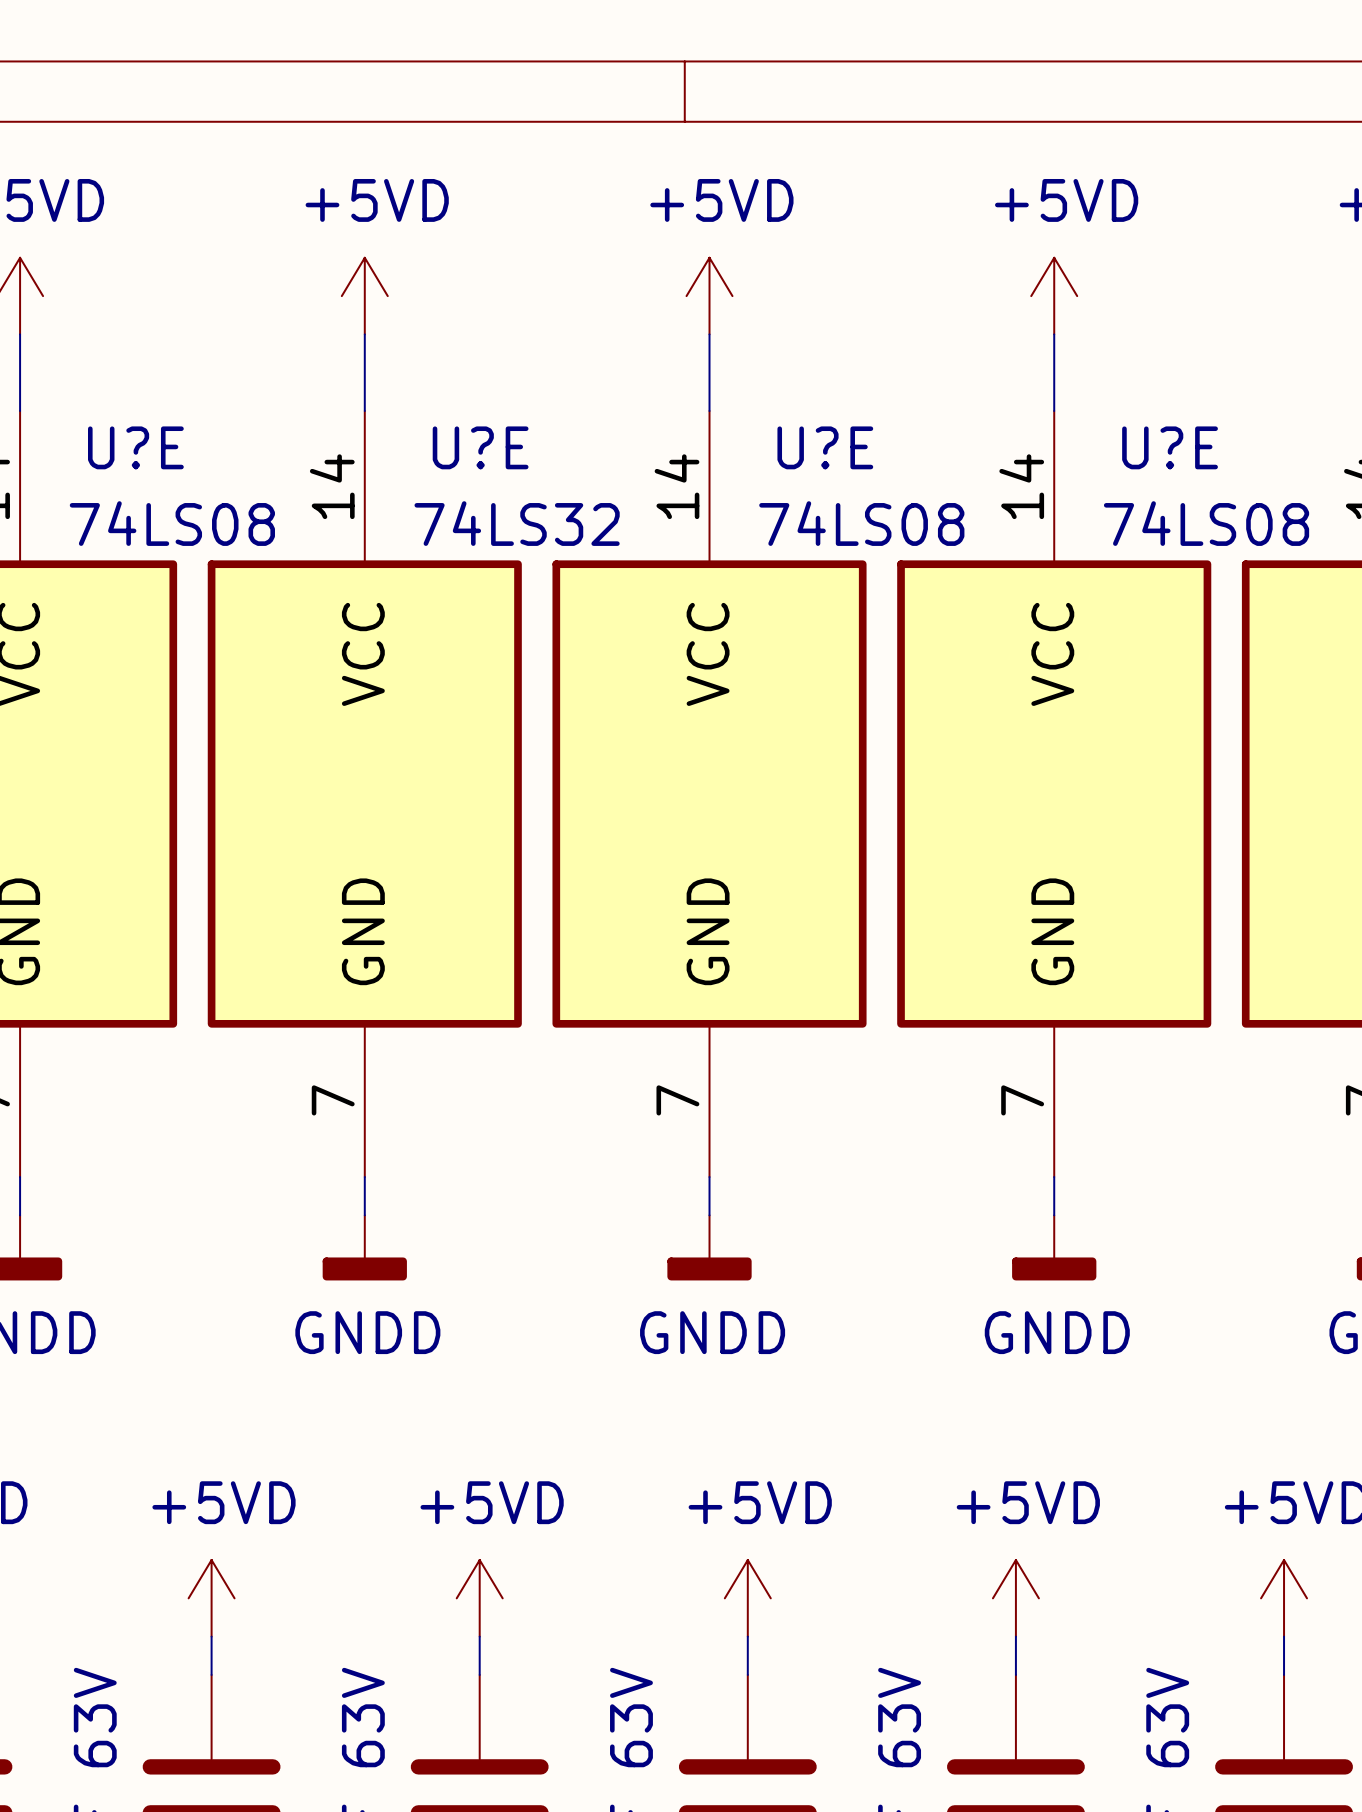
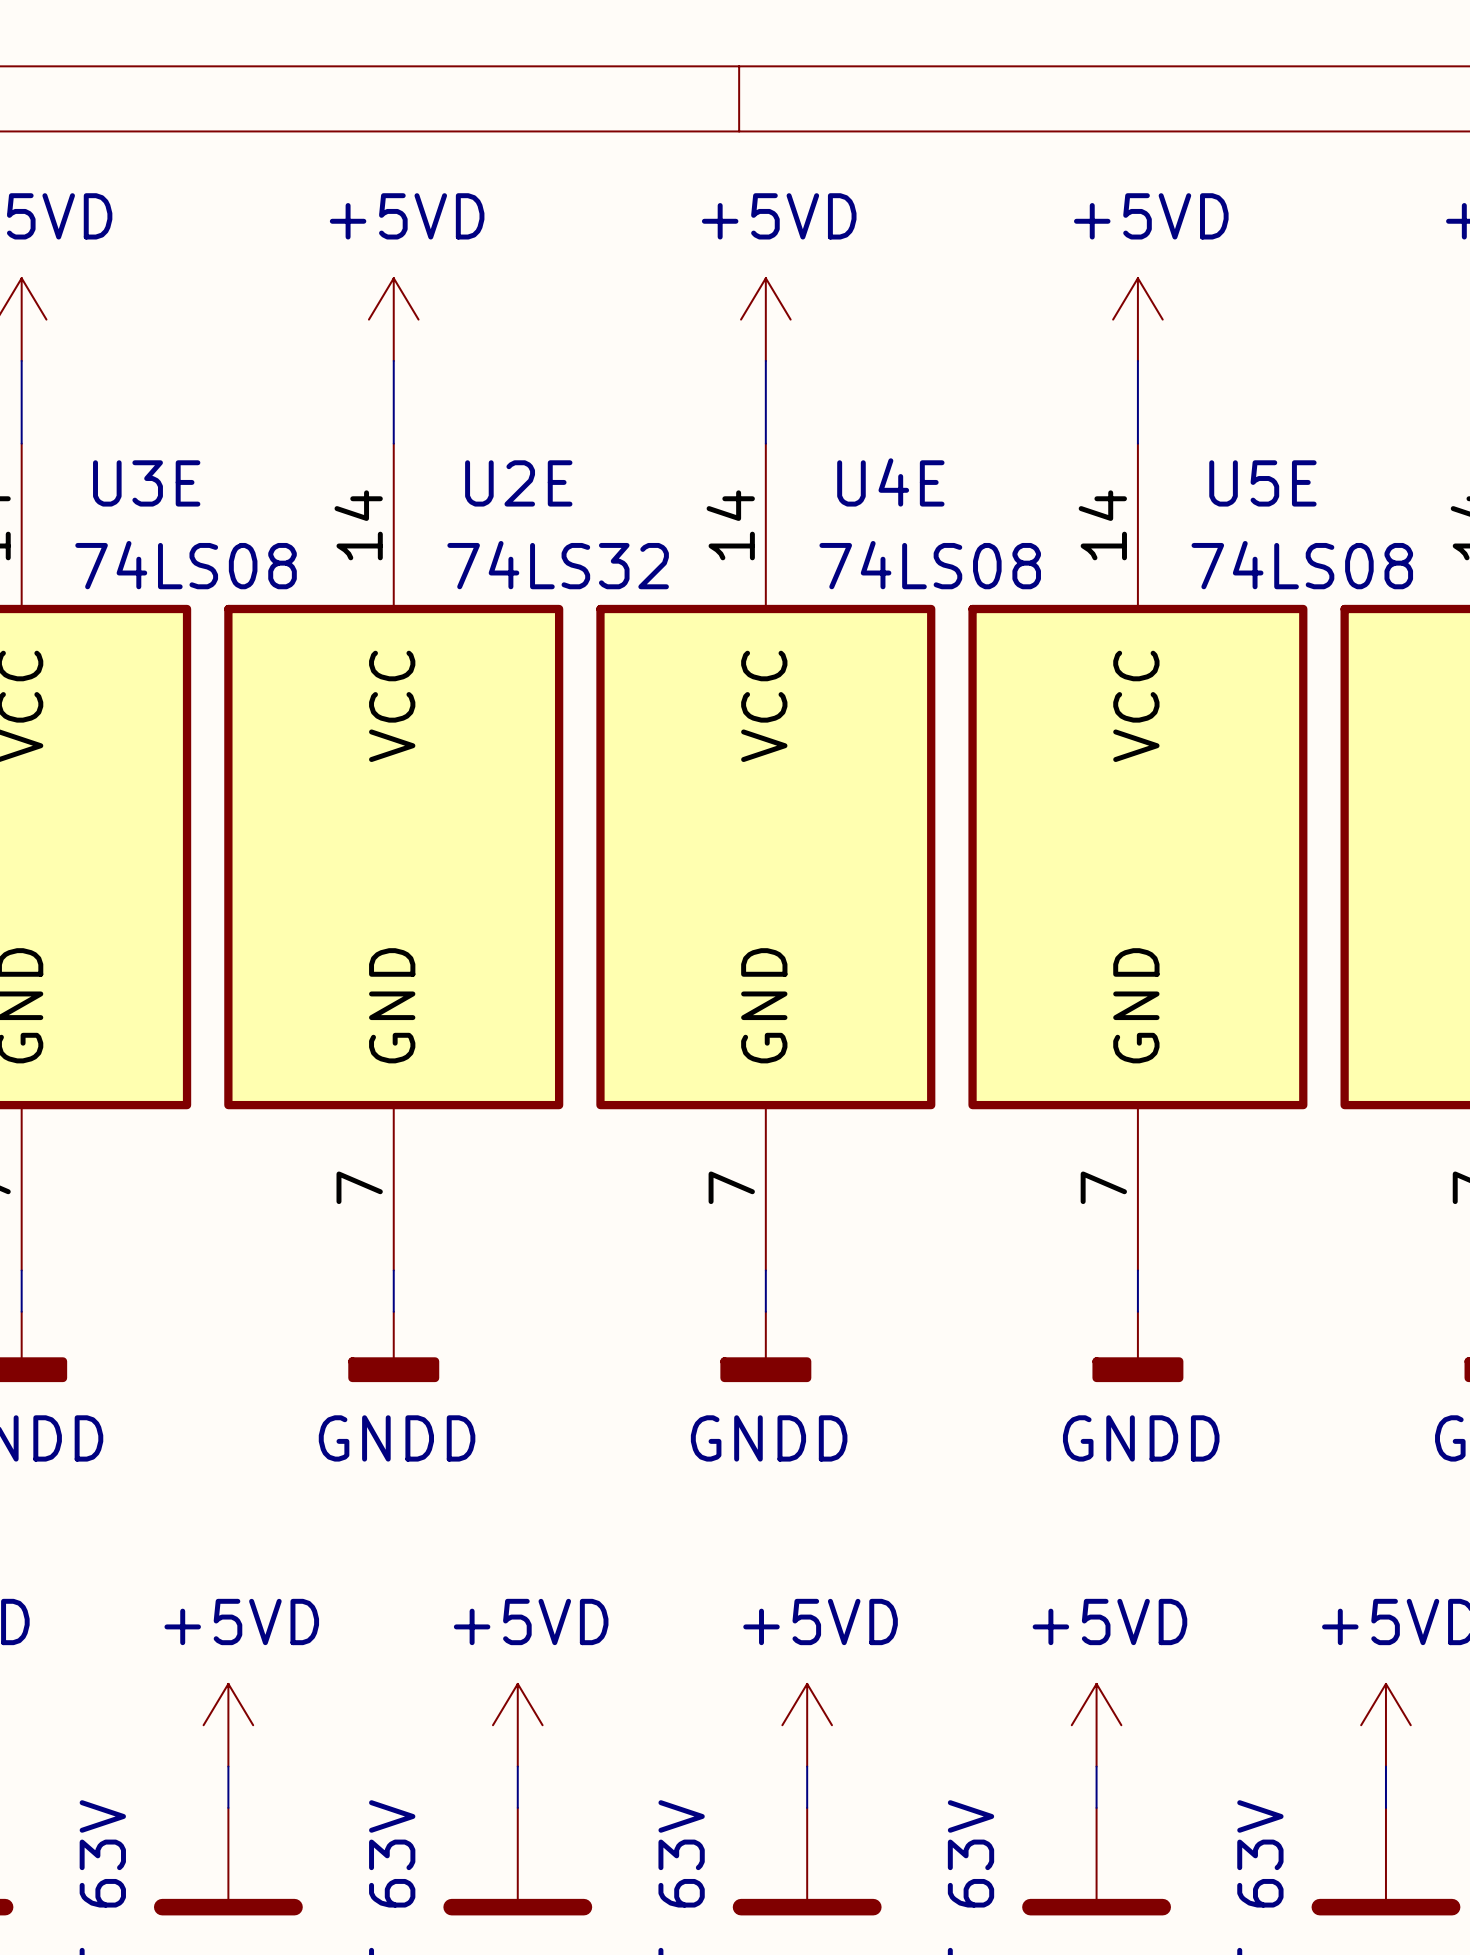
U?E name: U?E (135, 447) -> U3E (146, 483)
U?E name: U?E (480, 447) -> U2E (518, 483)
U?E name: U?E (825, 447) -> U4E (890, 482)
U?E name: U?E (1170, 447) -> U5E (1262, 483)

